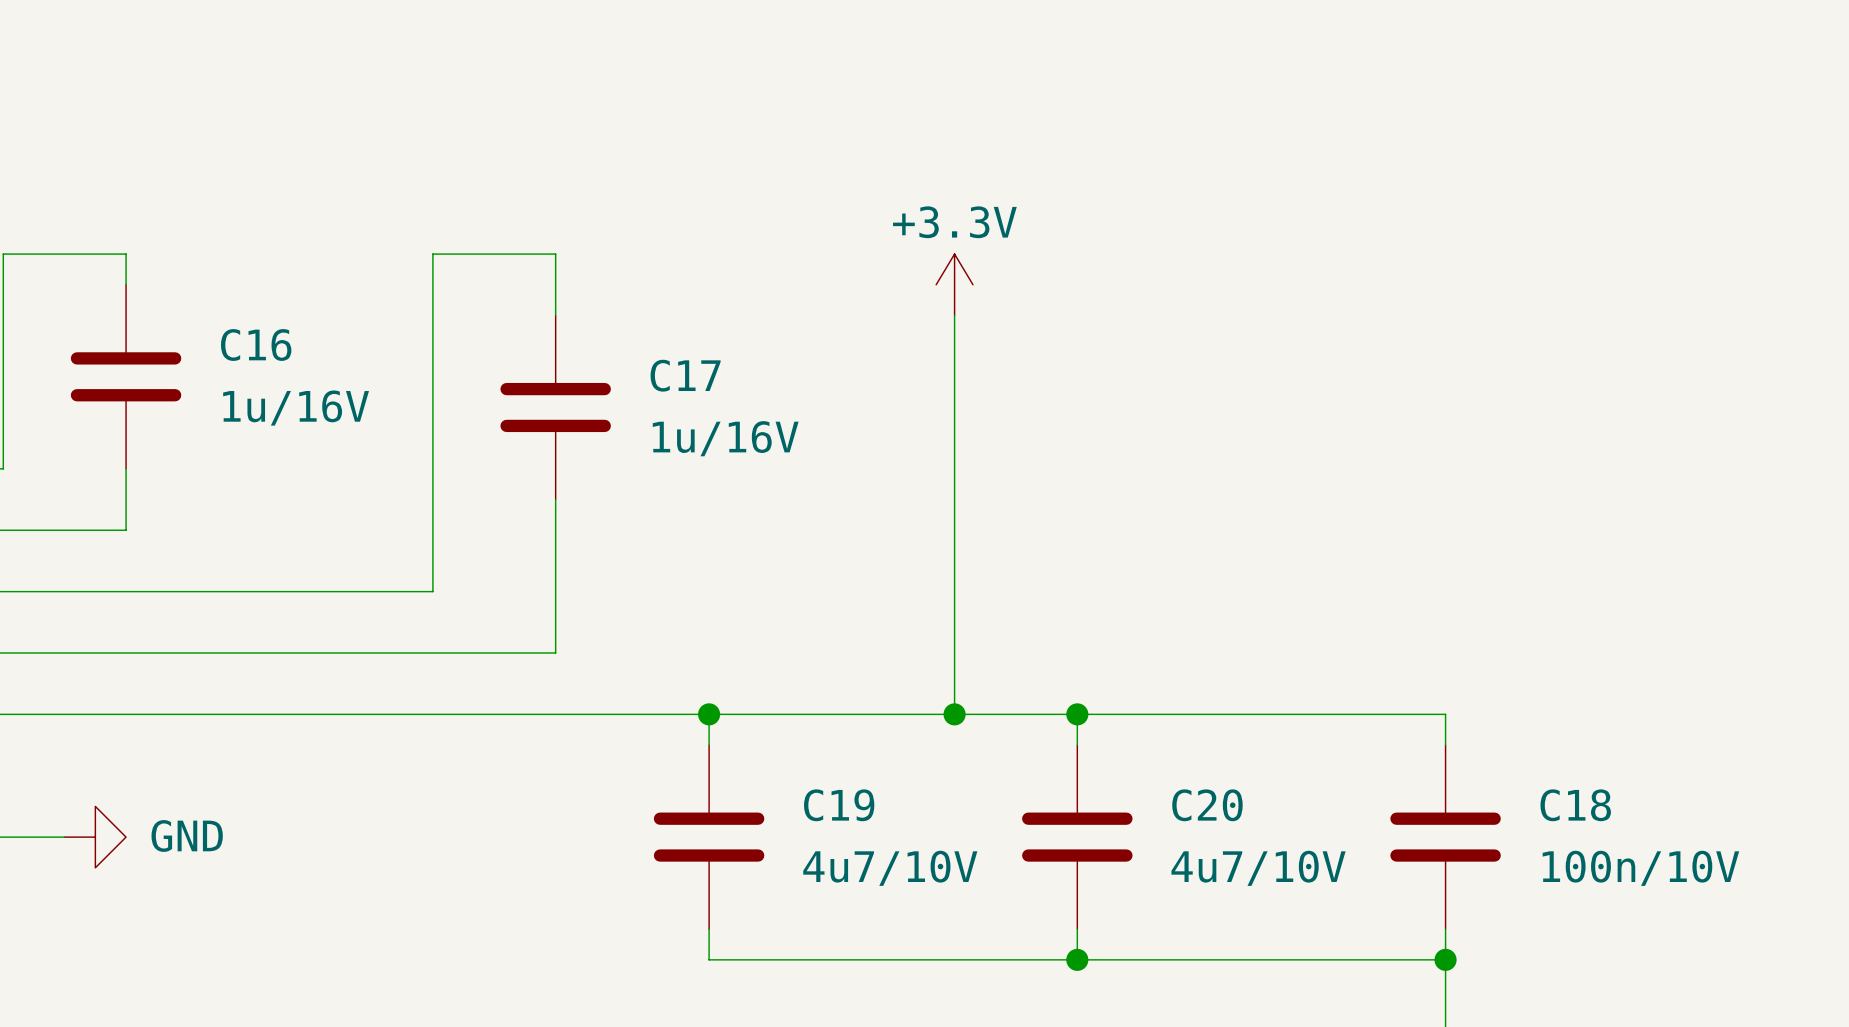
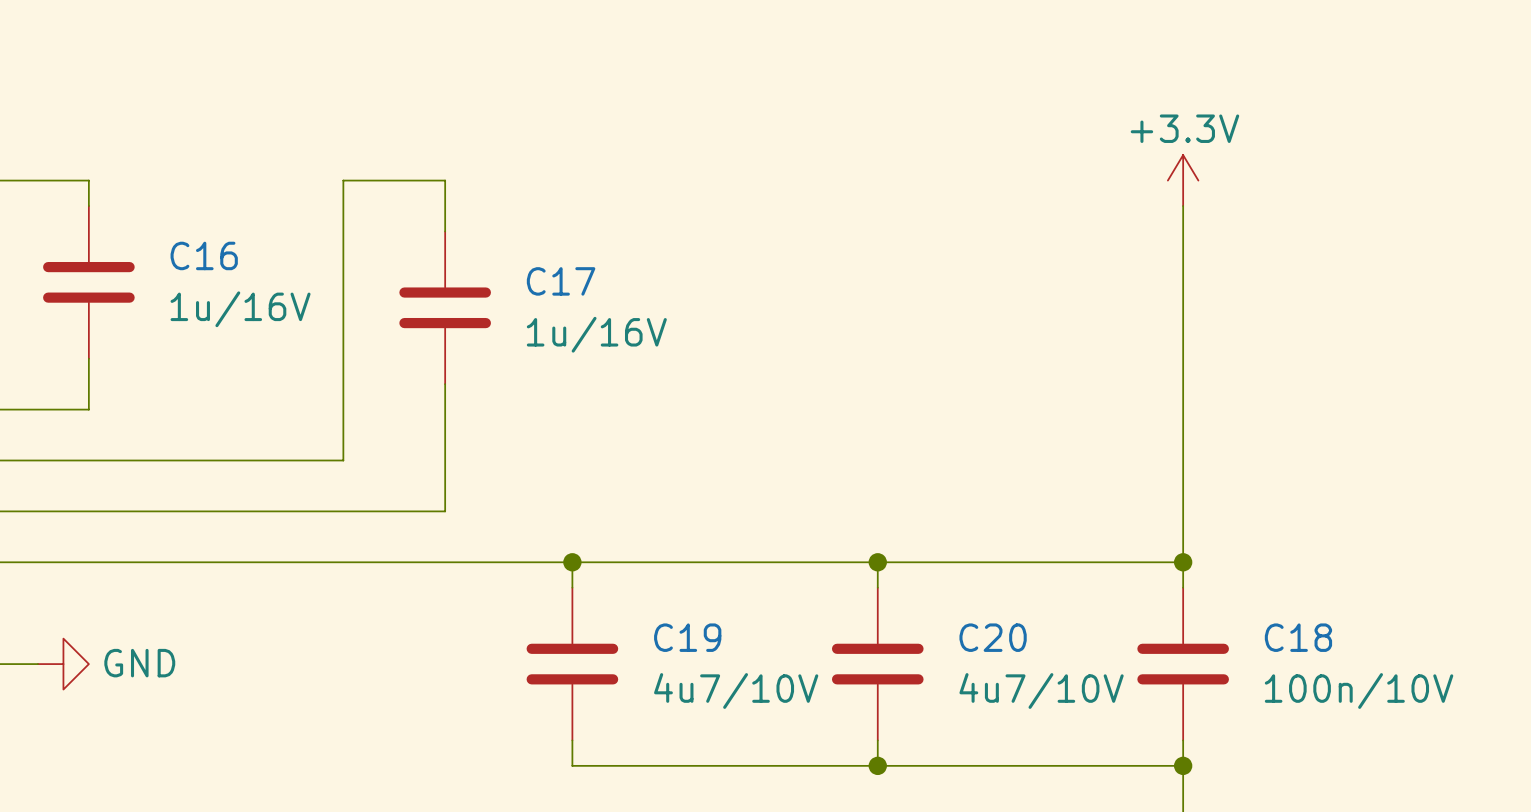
power symbol position: +3.3V (954, 284) -> +3.3V (1183, 180)
wire: none -> (1183, 206) (1183, 562)
wire: (954, 315) (954, 714) -> none
junction: (954, 714) -> none
junction: none -> (1183, 562)

